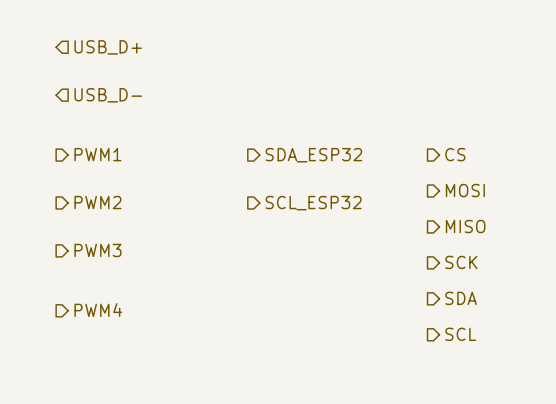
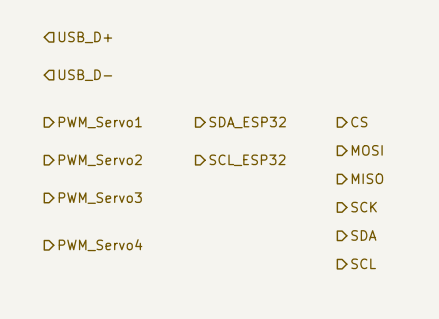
hierarchical label: PWM1 (97, 154) -> PWM_Servo1 (100, 122)
hierarchical label: PWM2 (97, 202) -> PWM_Servo2 (100, 160)
hierarchical label: PWM3 (97, 250) -> PWM_Servo3 (100, 198)
hierarchical label: PWM4 (98, 310) -> PWM_Servo4 (100, 245)

